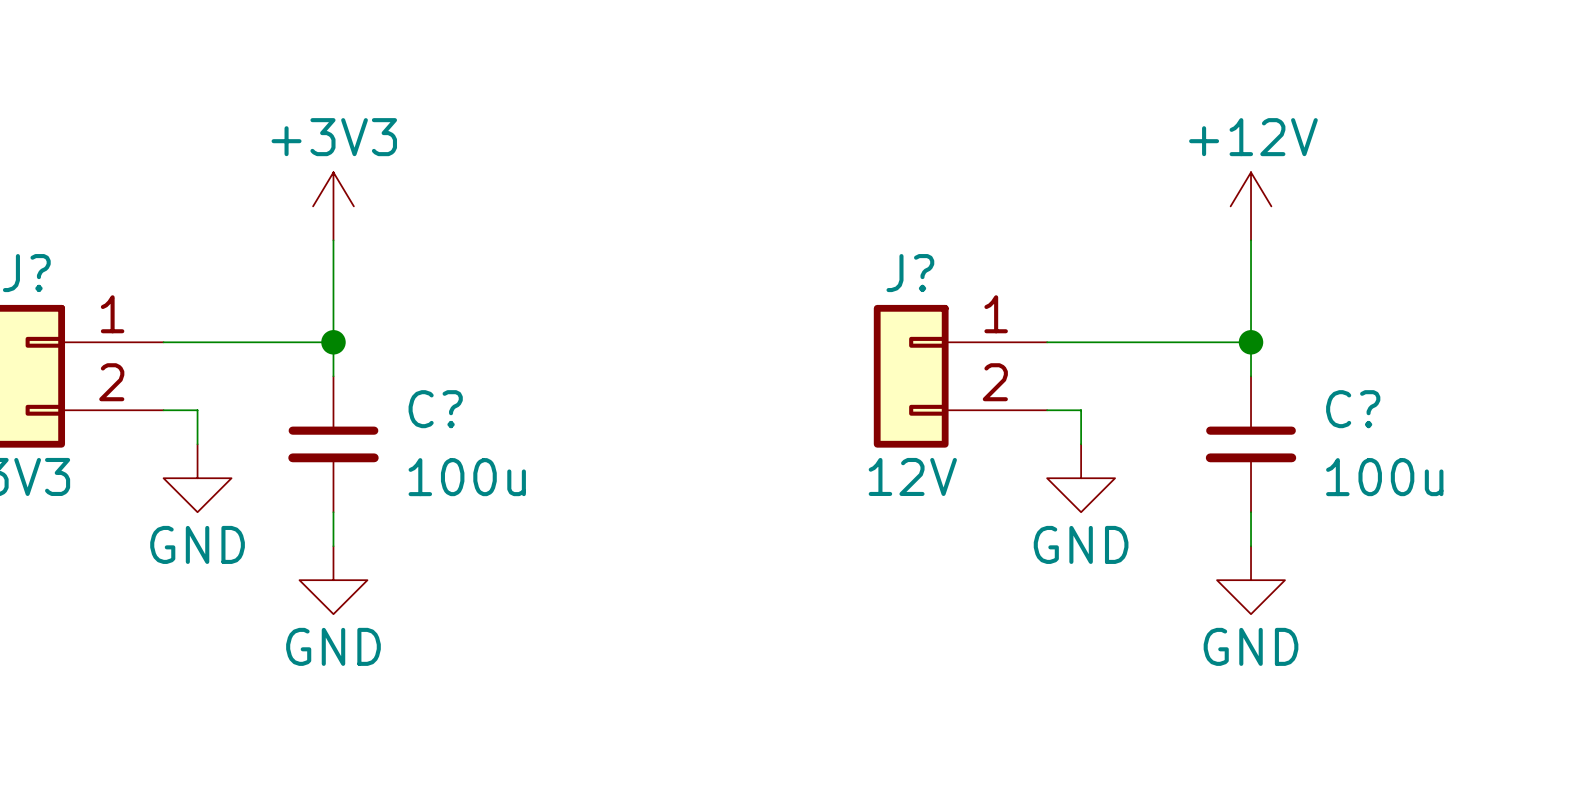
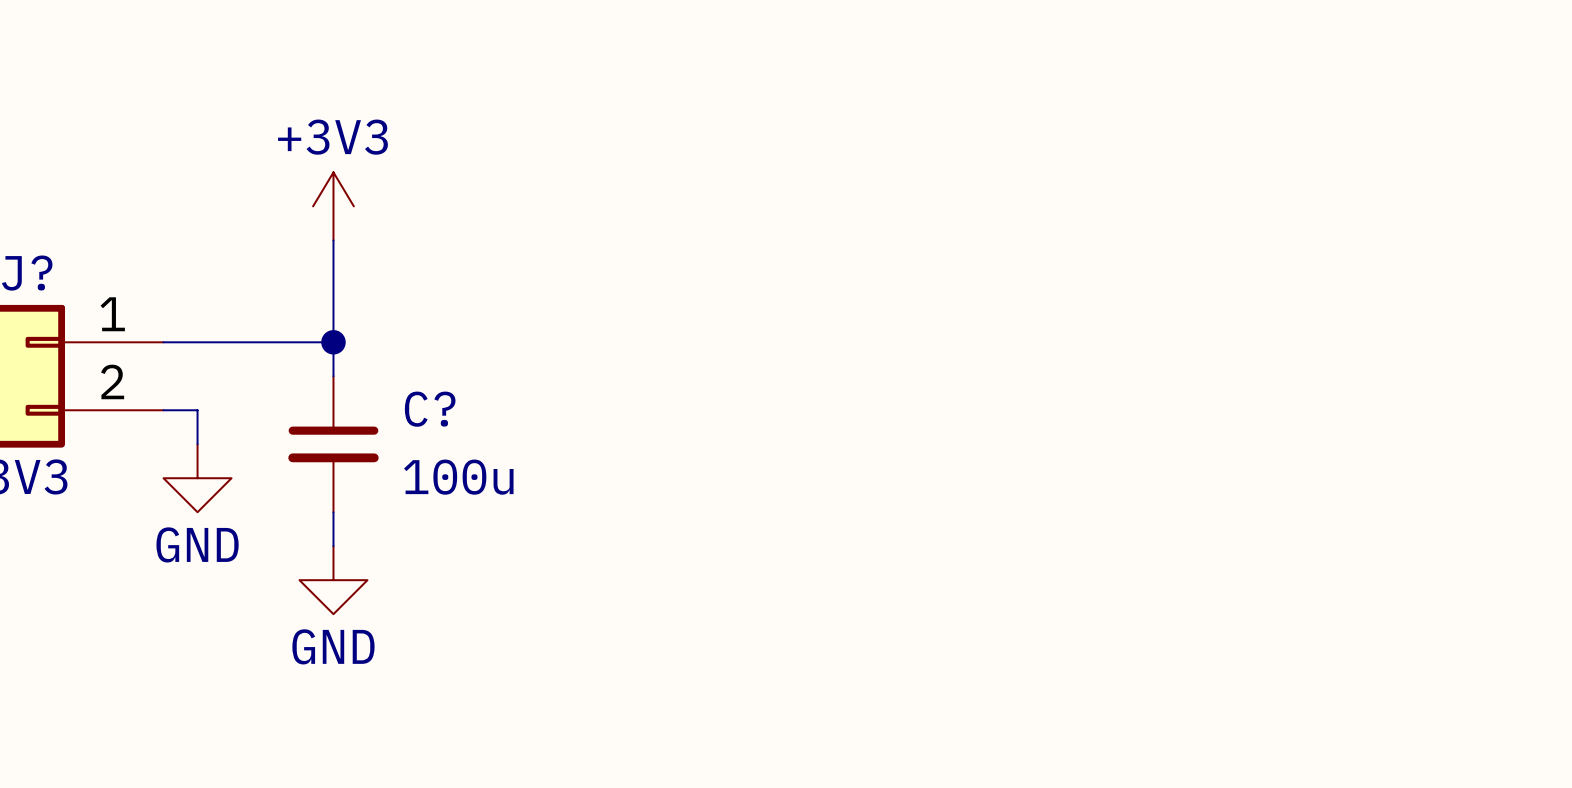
power symbol: +12V (1251, 206) -> none
wire: (1251, 240) (1251, 376) -> none
wire: (1047, 342) (1251, 342) -> none
junction: (1251, 342) -> none
J?: 12V (960, 376) -> none
wire: (1047, 410) (1081, 410) (1081, 444) -> none
C?: 100u (1251, 444) -> none
power symbol: GND (1081, 478) -> none
wire: (1251, 512) (1251, 546) -> none
power symbol: GND (1251, 580) -> none

